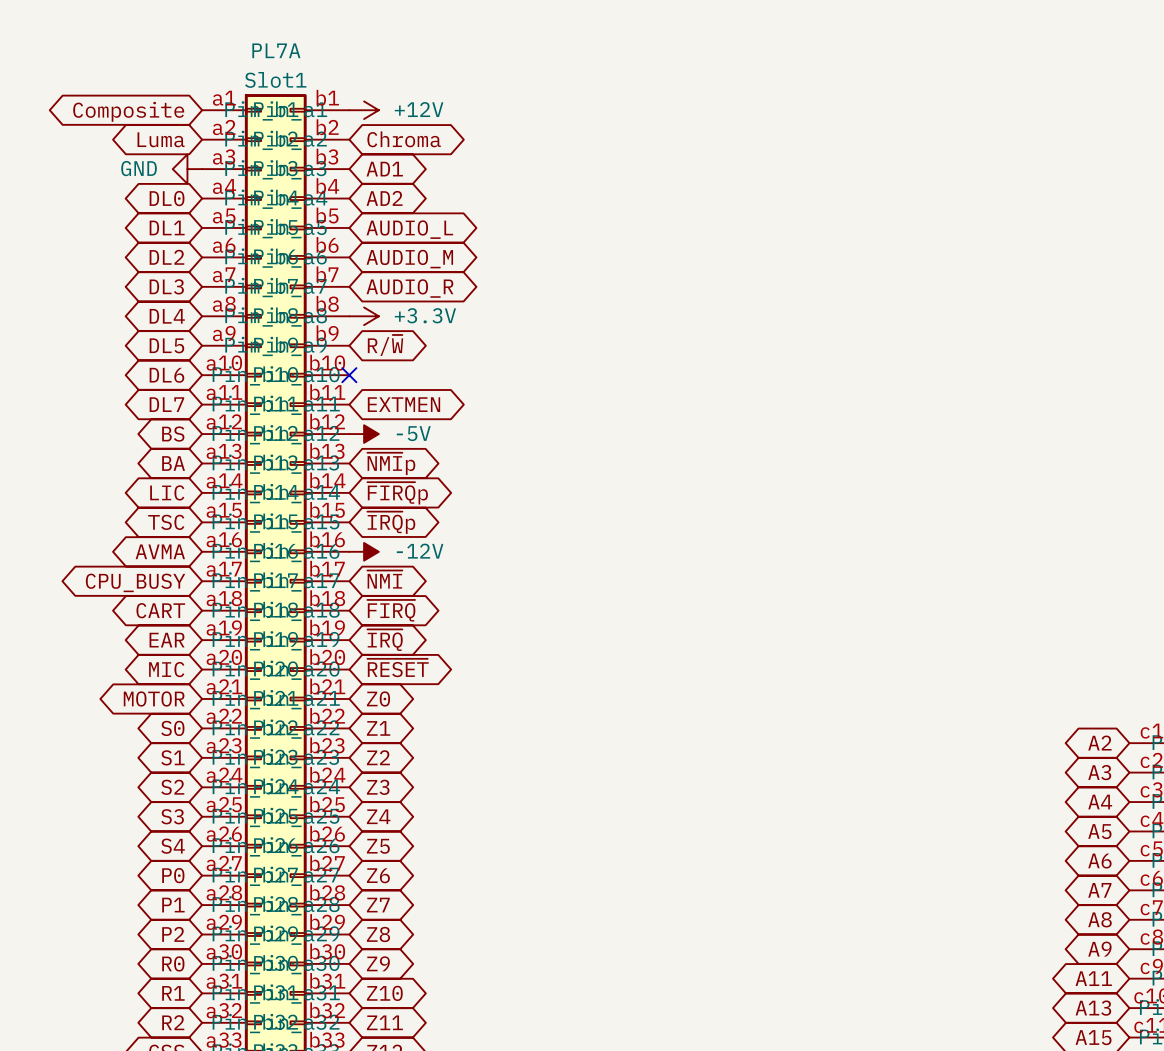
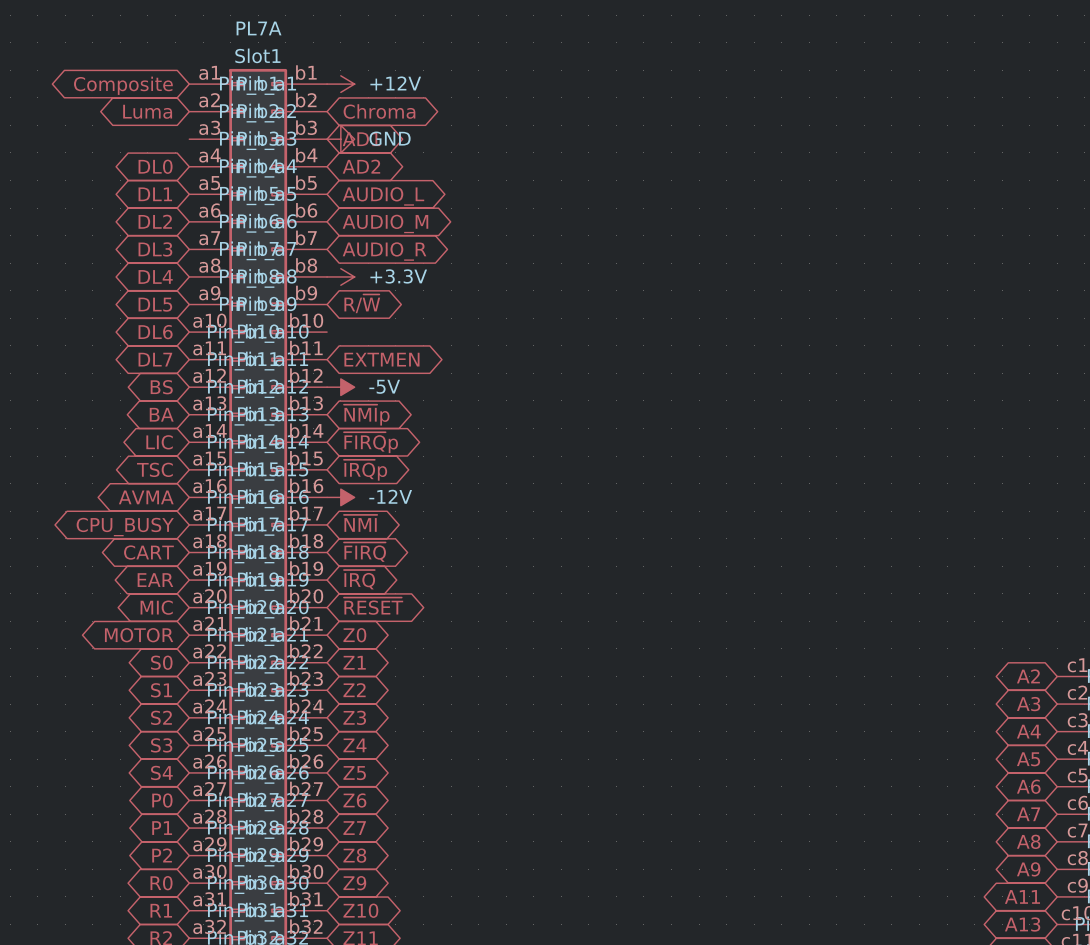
power symbol rotation: 0° (187, 169) -> 180° (340, 139)
power symbol position: GND (187, 169) -> GND (340, 139)
no-connect mark: (349, 375) -> none

